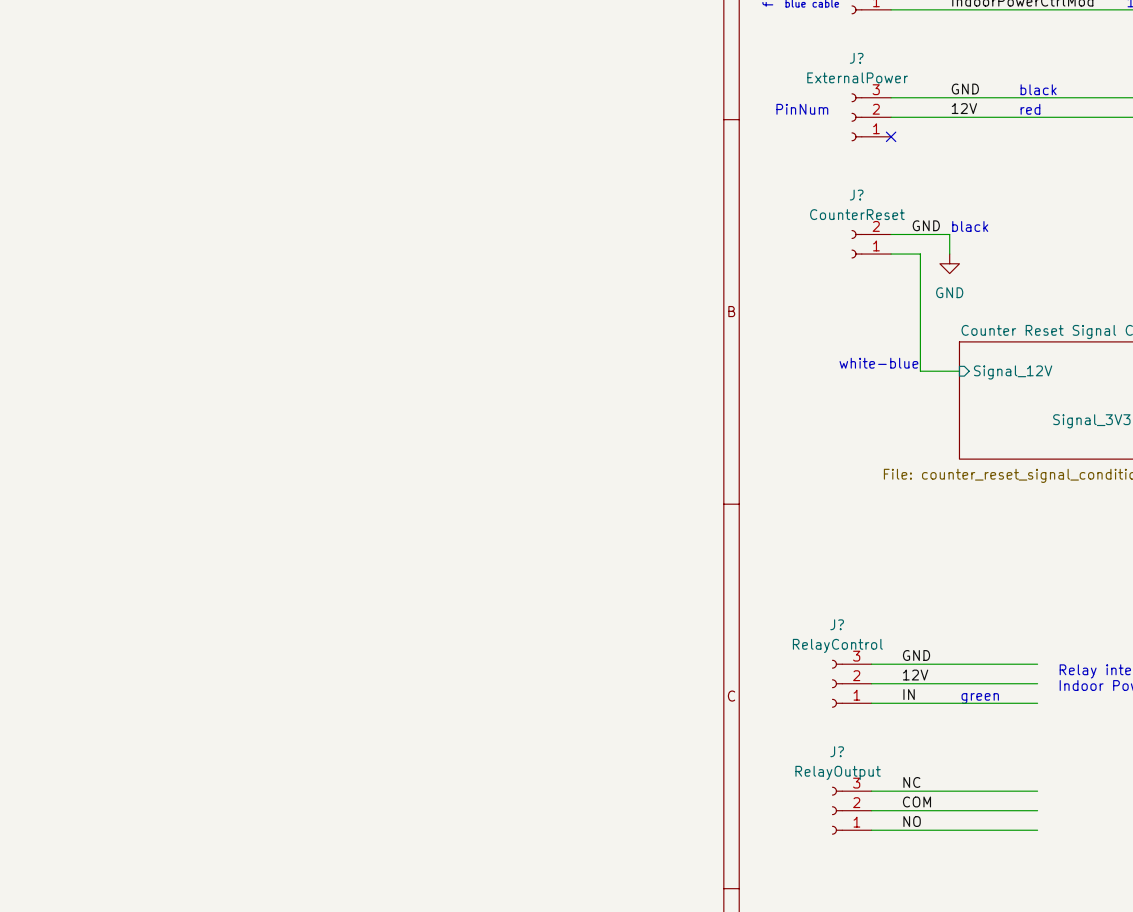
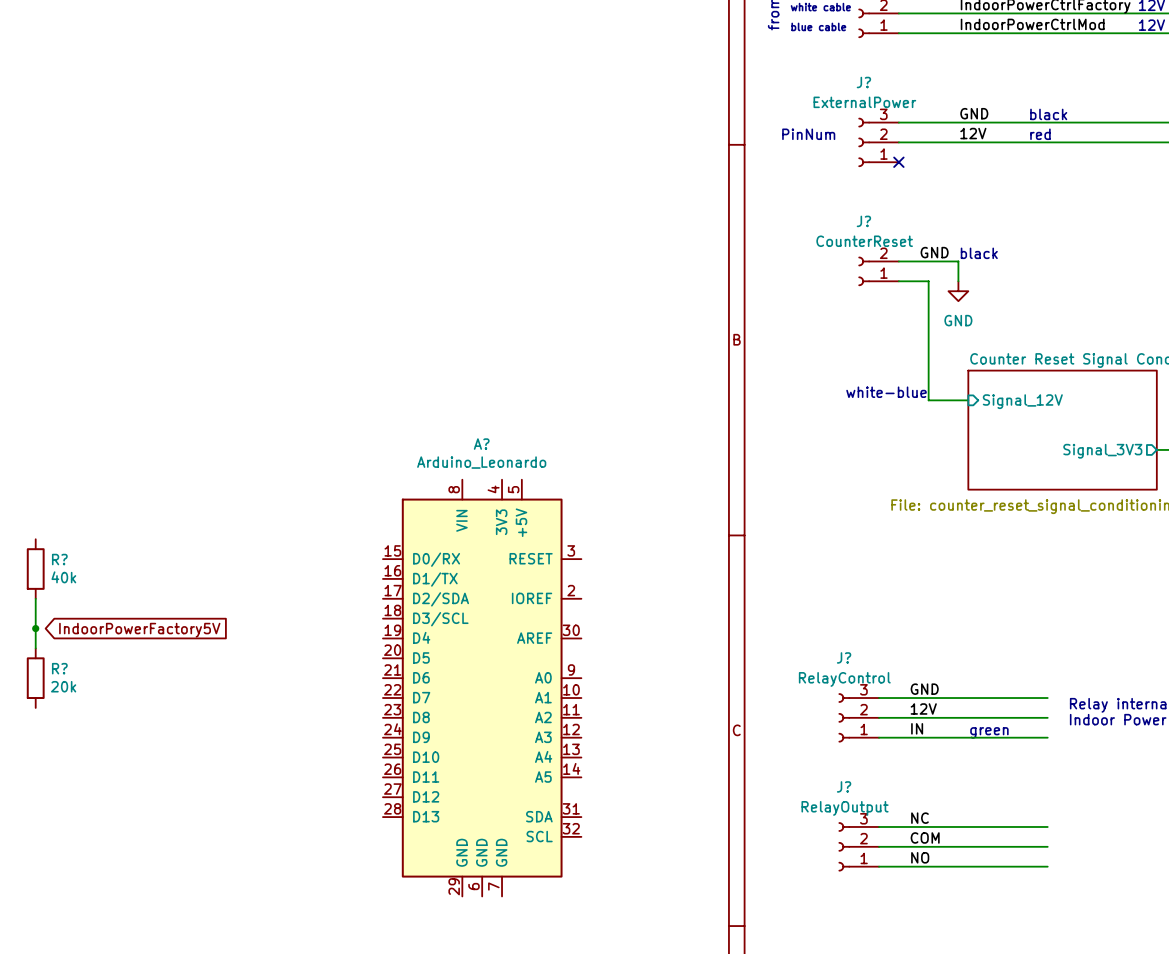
R?: none -> 40k (35, 569)
wire: none -> (35, 598) (35, 648)
junction: none -> (35, 628)
global label: none -> IndoorPowerFactory5V (139, 630)
R?: none -> 20k (35, 678)
A?: none -> Arduino_Leonardo (482, 688)

